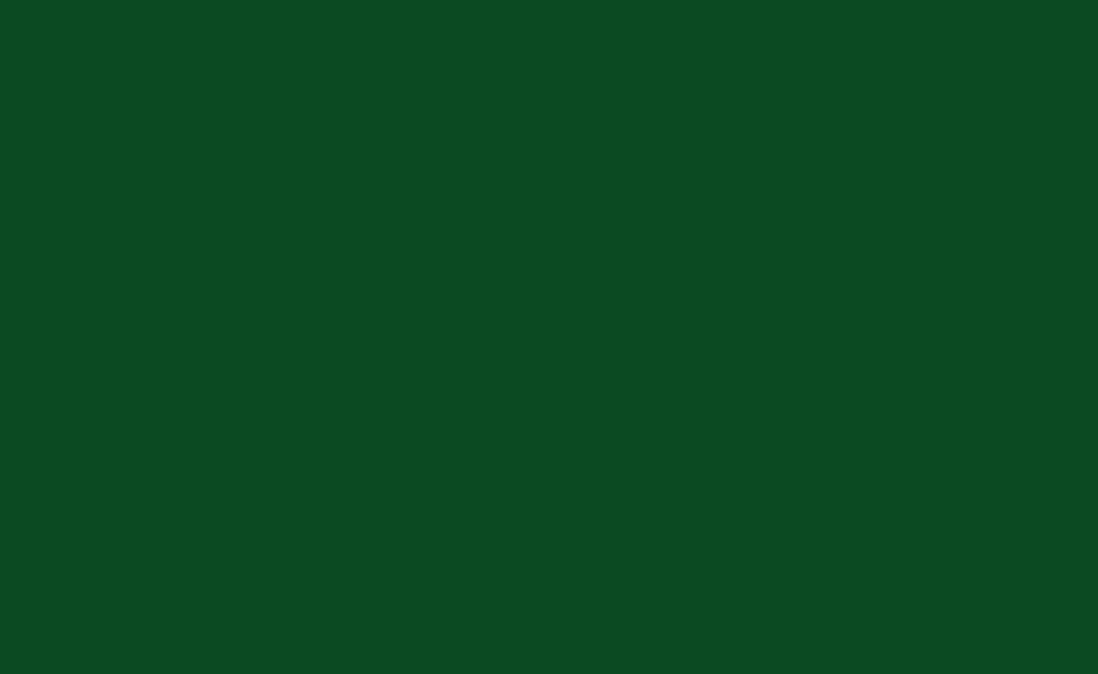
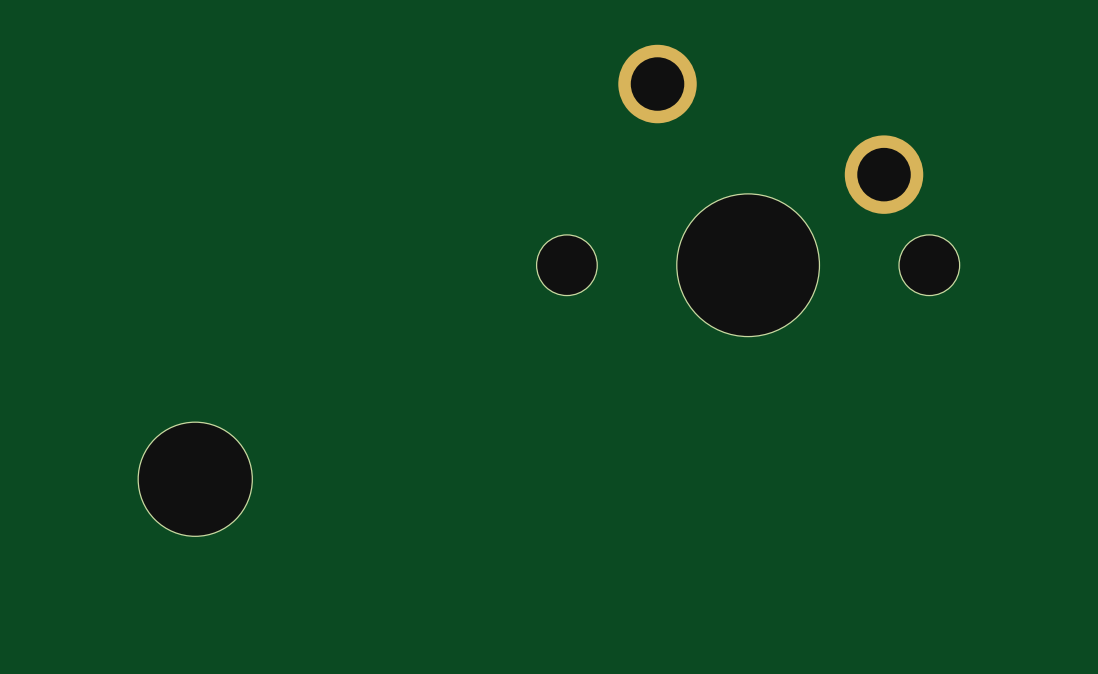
part: none -> (748, 190)
part: none -> (195, 479)

